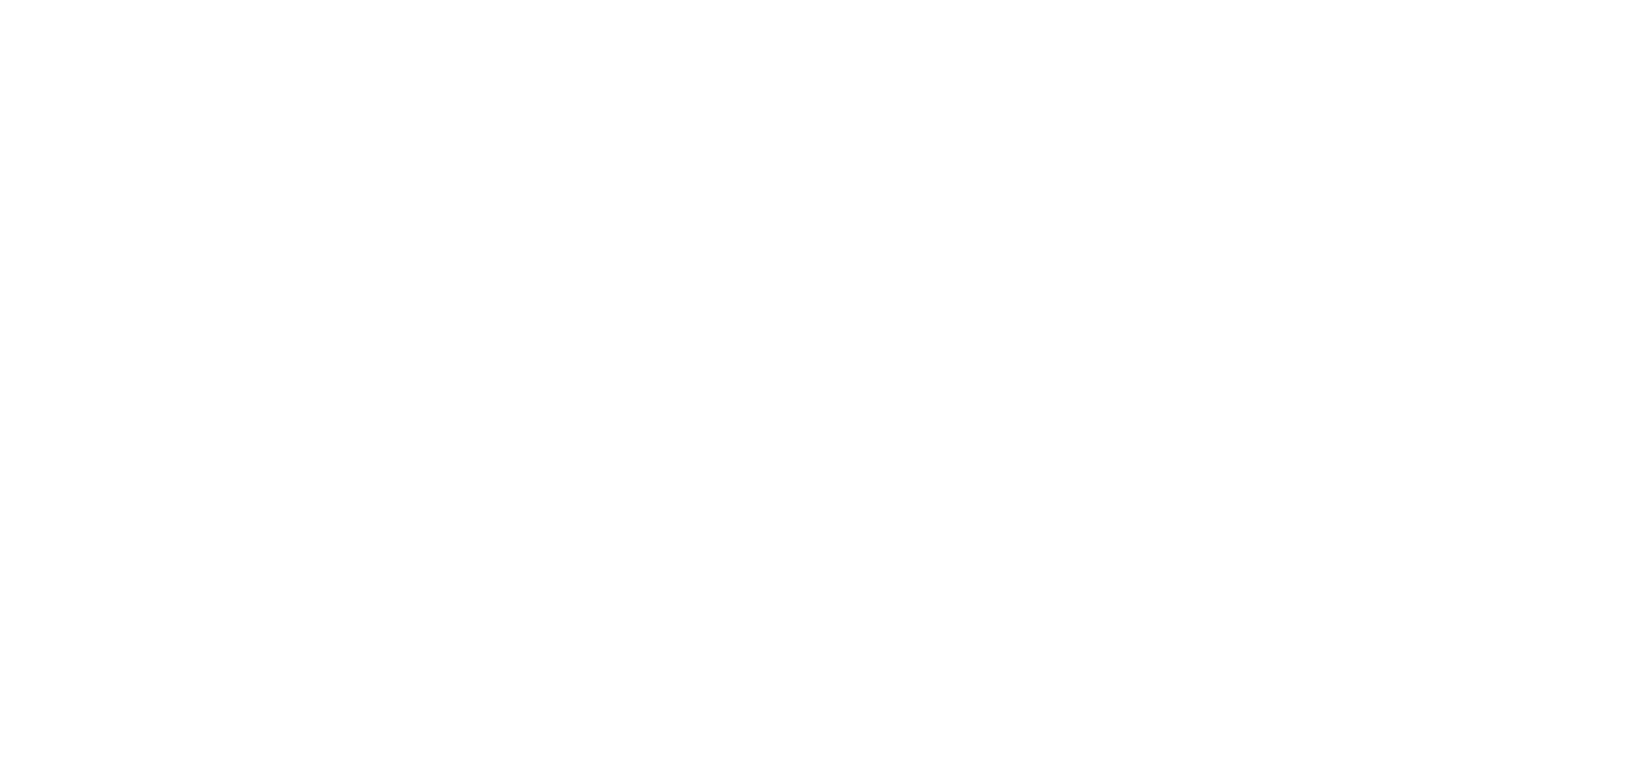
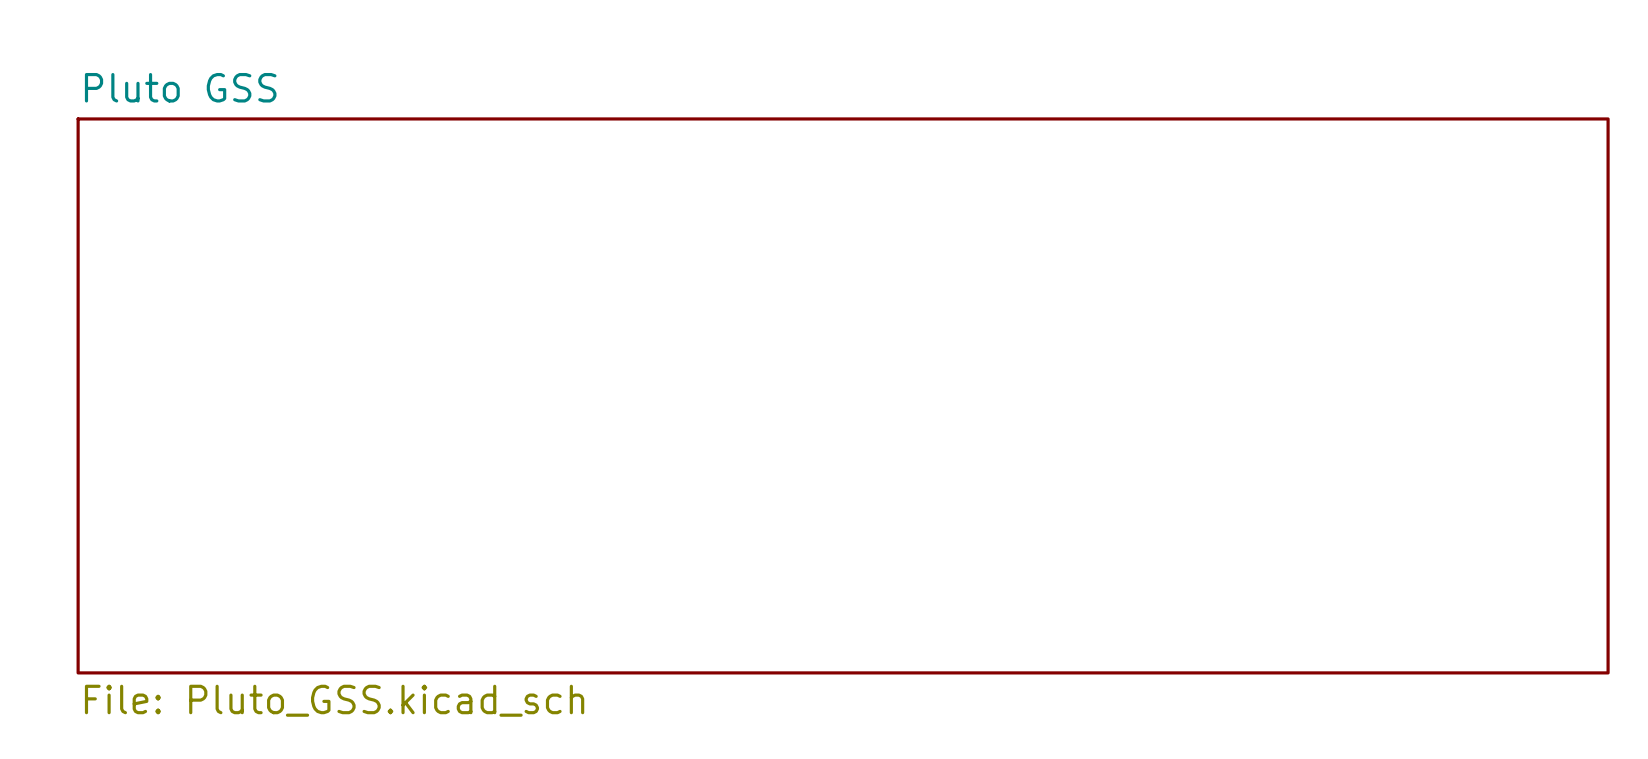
sheet Pluto GSS: none -> File: Pluto_GSS.kicad_sch (843, 395)

